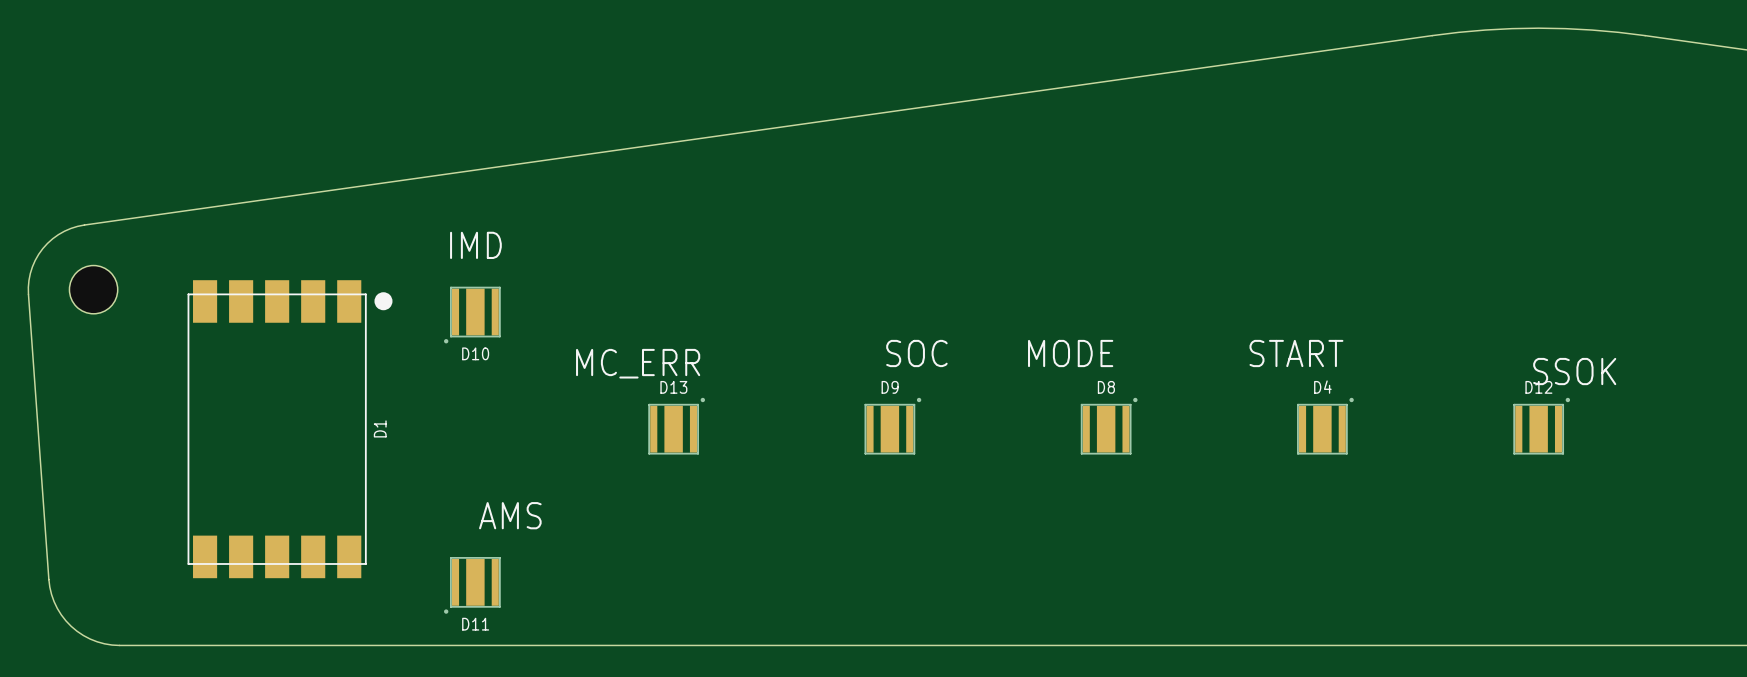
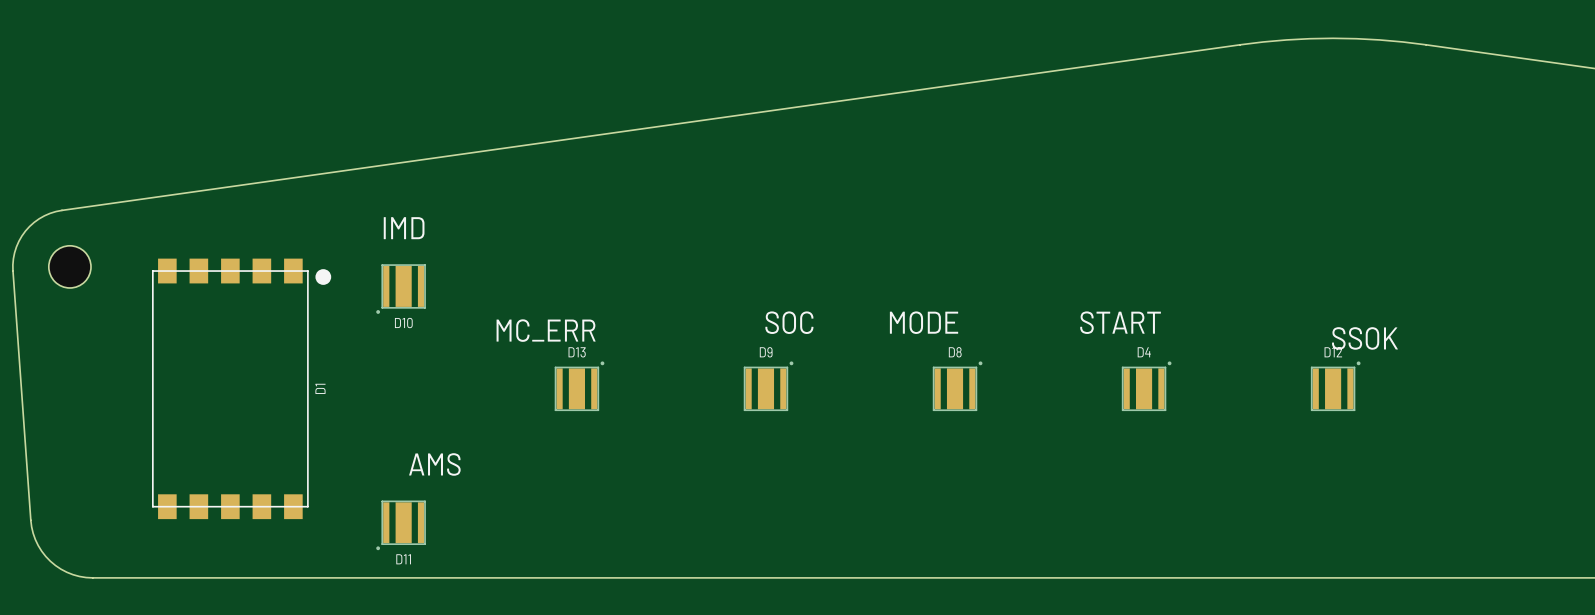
D1 footprint: [187, 280, 393, 579] -> [152, 258, 332, 520]

